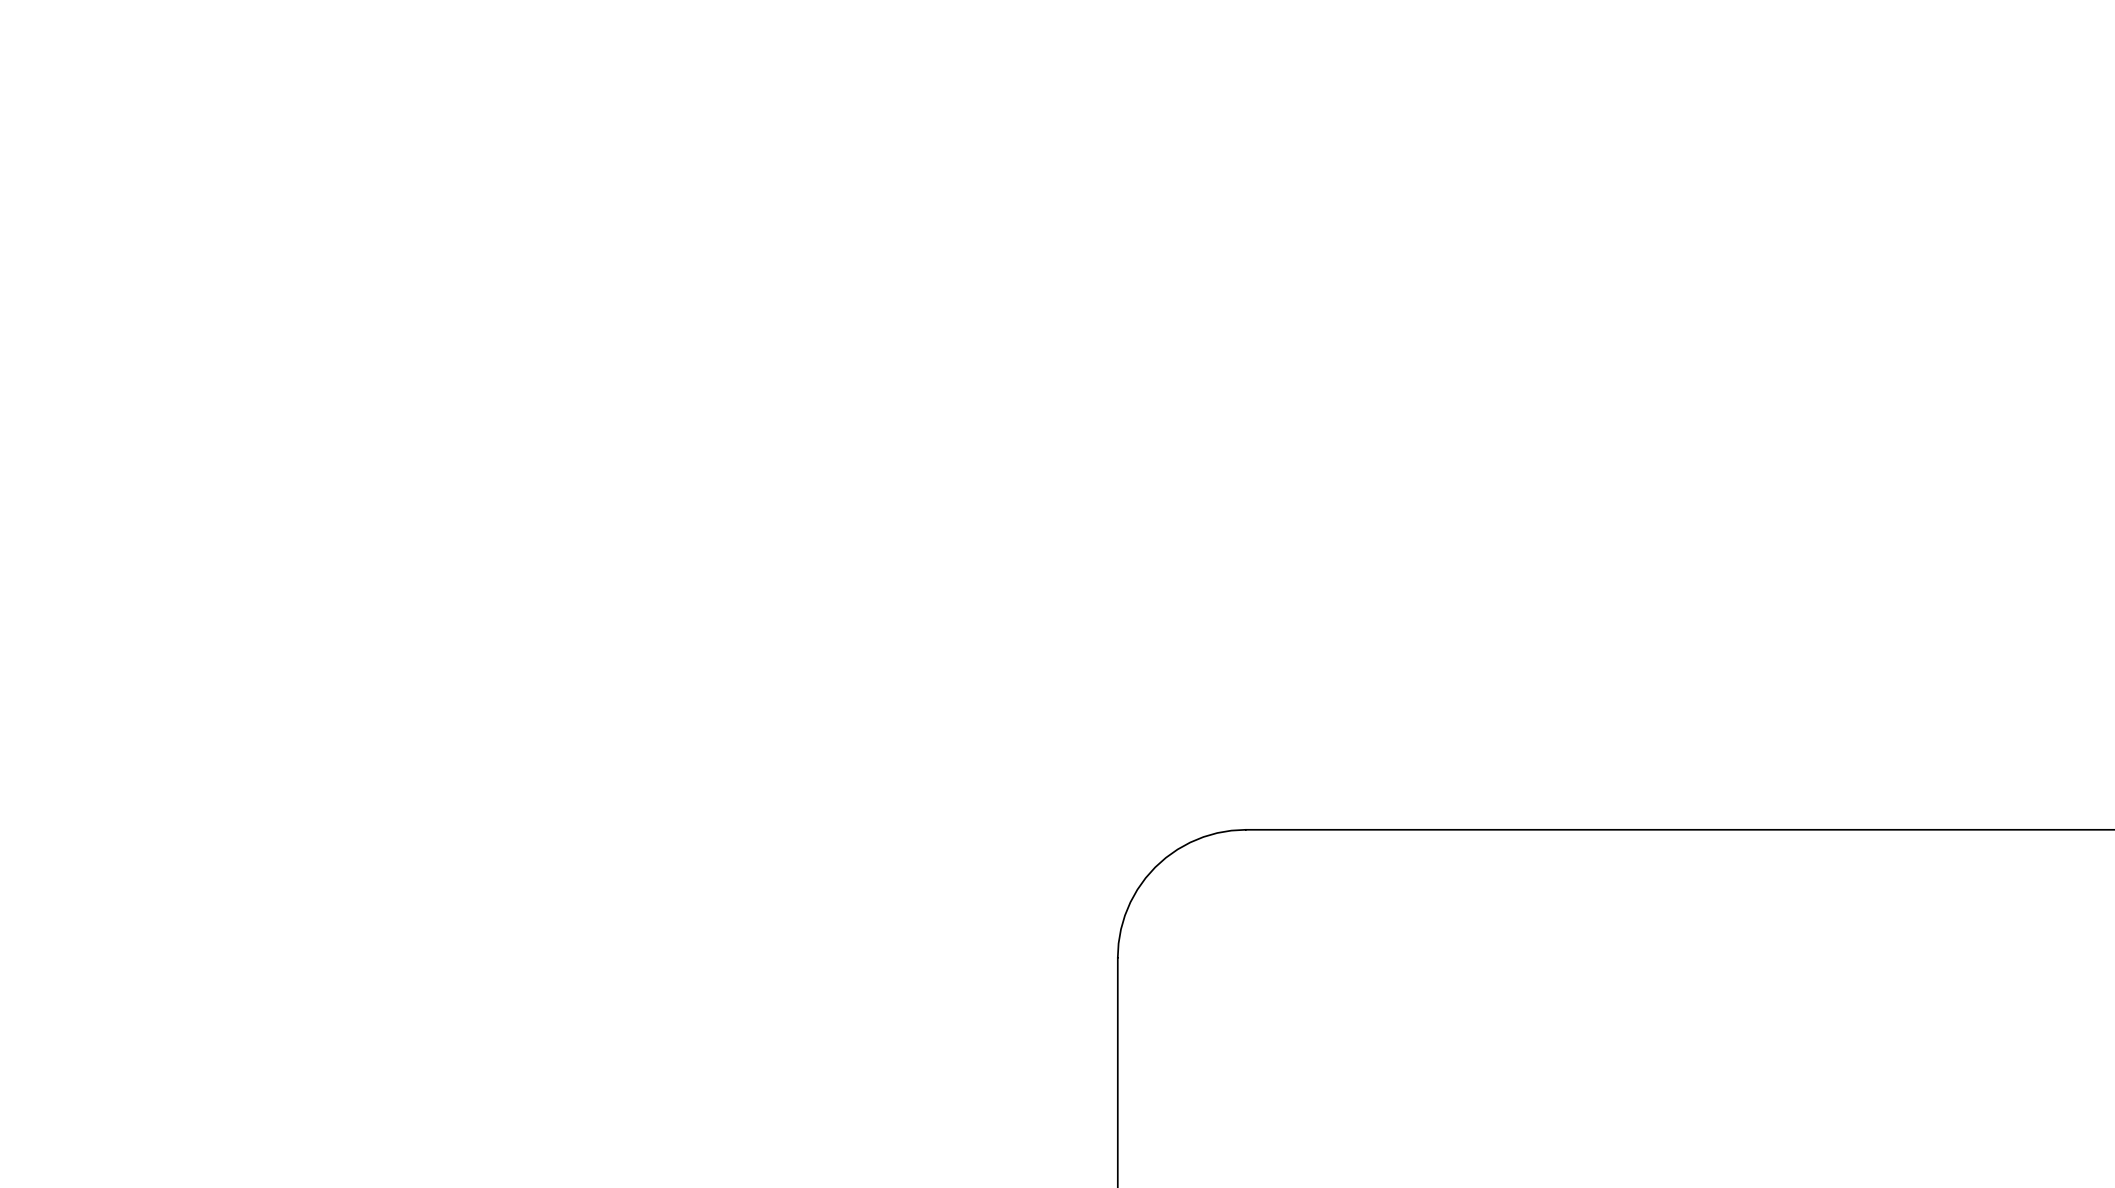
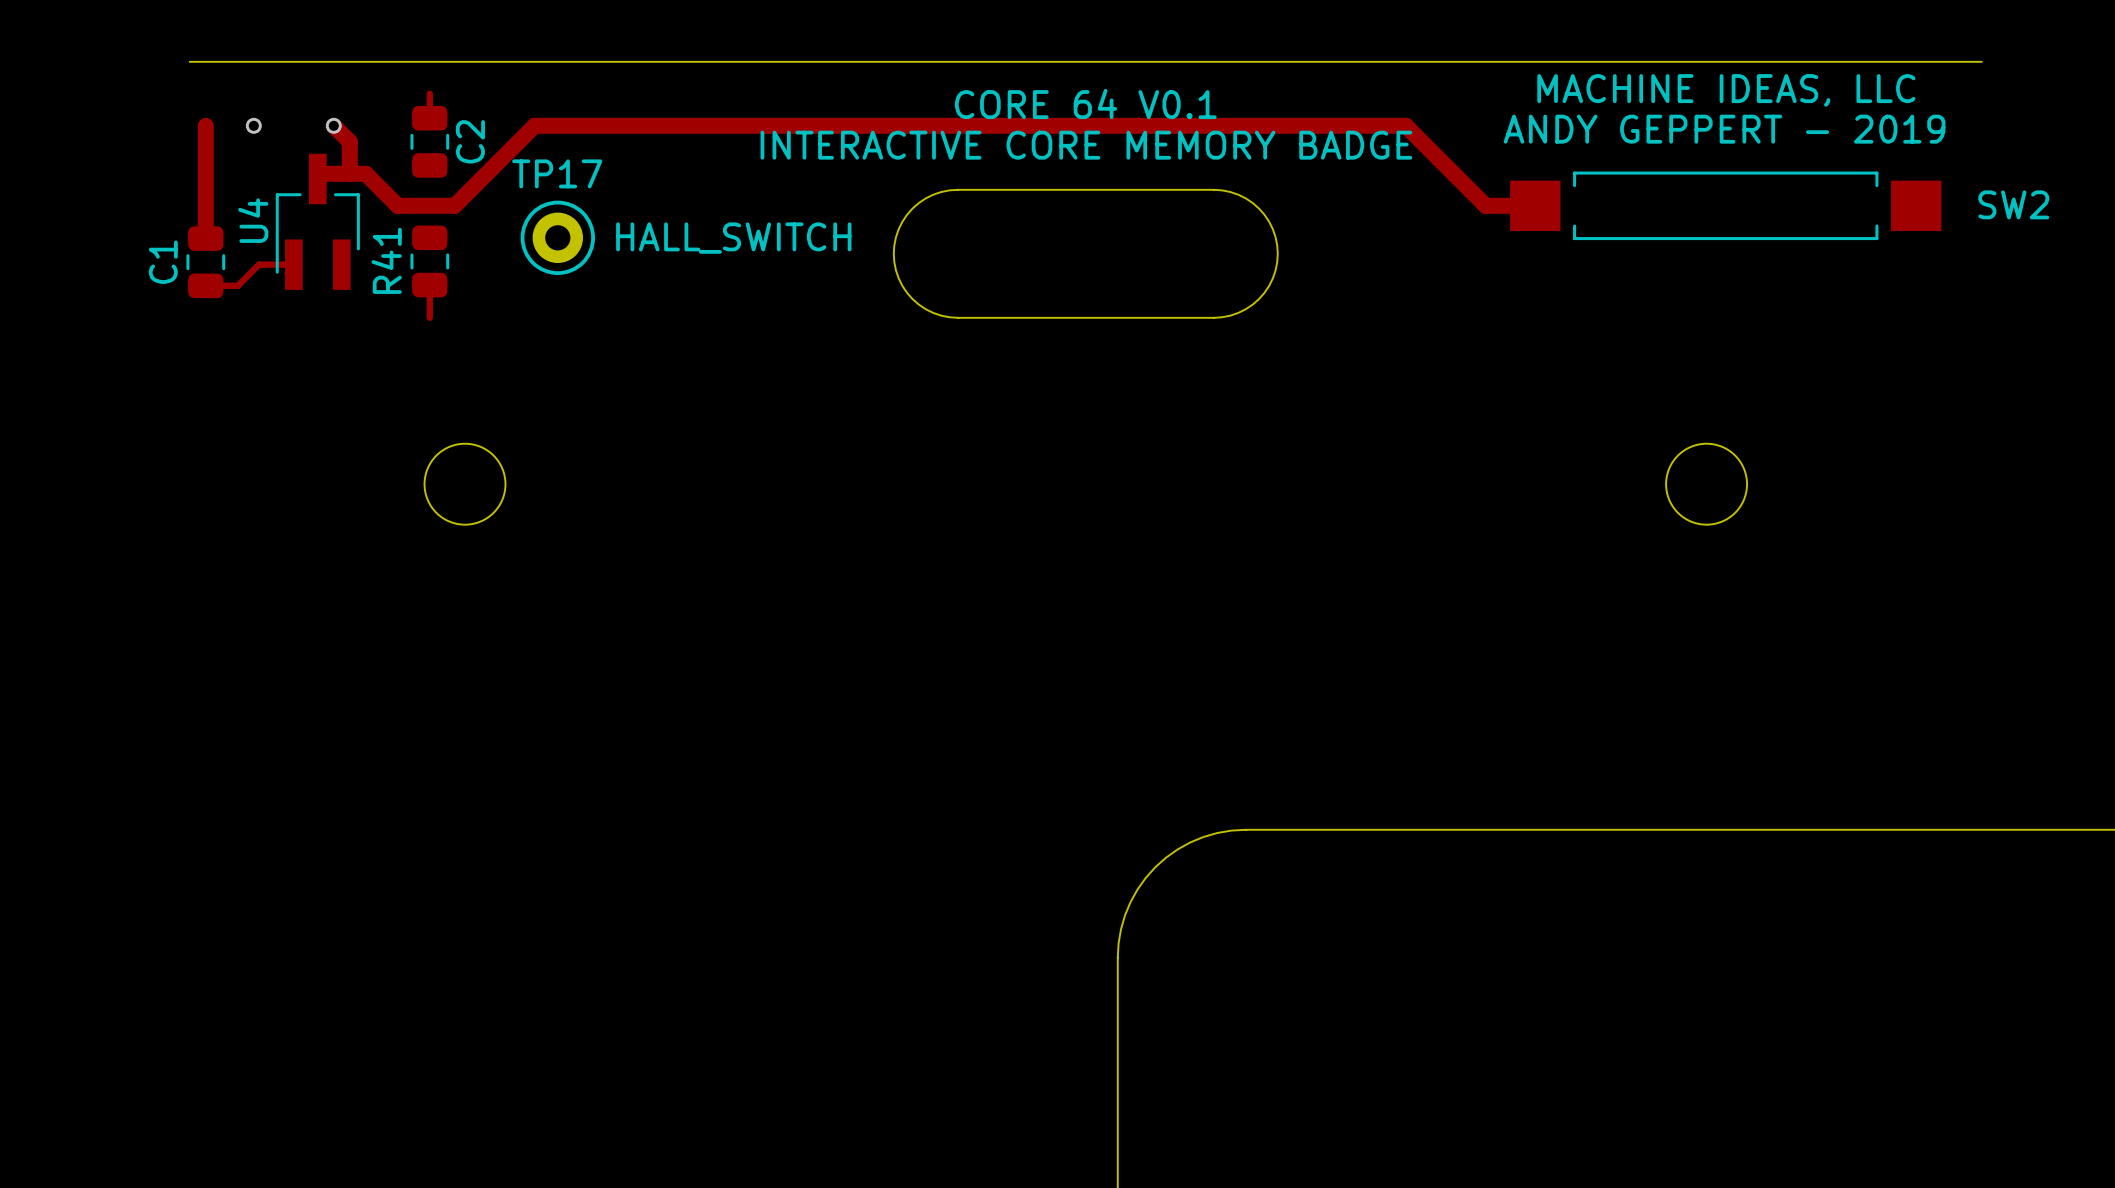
board edge: none -> (189, 61) (1981, 61)
text: none -> MACHINE IDEAS, LLC (1726, 90)
track: none -> (429, 93) (429, 118)
text: none -> CORE 64 V0.1 (1085, 104)
track: none -> (205, 125) (205, 238)
via: none -> (253, 125)
track: none -> (333, 125) (349, 141) (349, 173)
via: none -> (333, 125)
text: none -> ANDY GEPPERT - 2019 (1724, 129)
C2: none -> (429, 141)
text: none -> INTERACTIVE CORE MEMORY BADGE (1086, 145)
track: none -> (317, 178) (322, 173) (365, 173) (397, 205) (454, 205) (534, 125) (1405, 125) (1485, 205) (1535, 205)
board edge: none -> (957, 189) (1213, 189) (1230, 192) (1252, 203) (1269, 221) (1277, 245) (1275, 270) (1264, 292) (1252, 304) (1238, 312) (1222, 317) (957, 317) (941, 315) (925, 309) (907, 292) (895, 270) (894, 245) (902, 221) (912, 208) (933, 194) (957, 189)
SW2: none -> (1725, 205)
U4: none -> (317, 221)
TP17: none -> HALL_SWITCH (557, 237)
R41: none -> (429, 261)
C1: none -> (205, 262)
track: none -> (293, 281) (293, 264) (258, 264) (237, 285) (205, 285)
track: none -> (429, 285) (429, 317)
round board edge: none -> [423, 443, 507, 526]
round board edge: none -> [1665, 443, 1748, 526]

